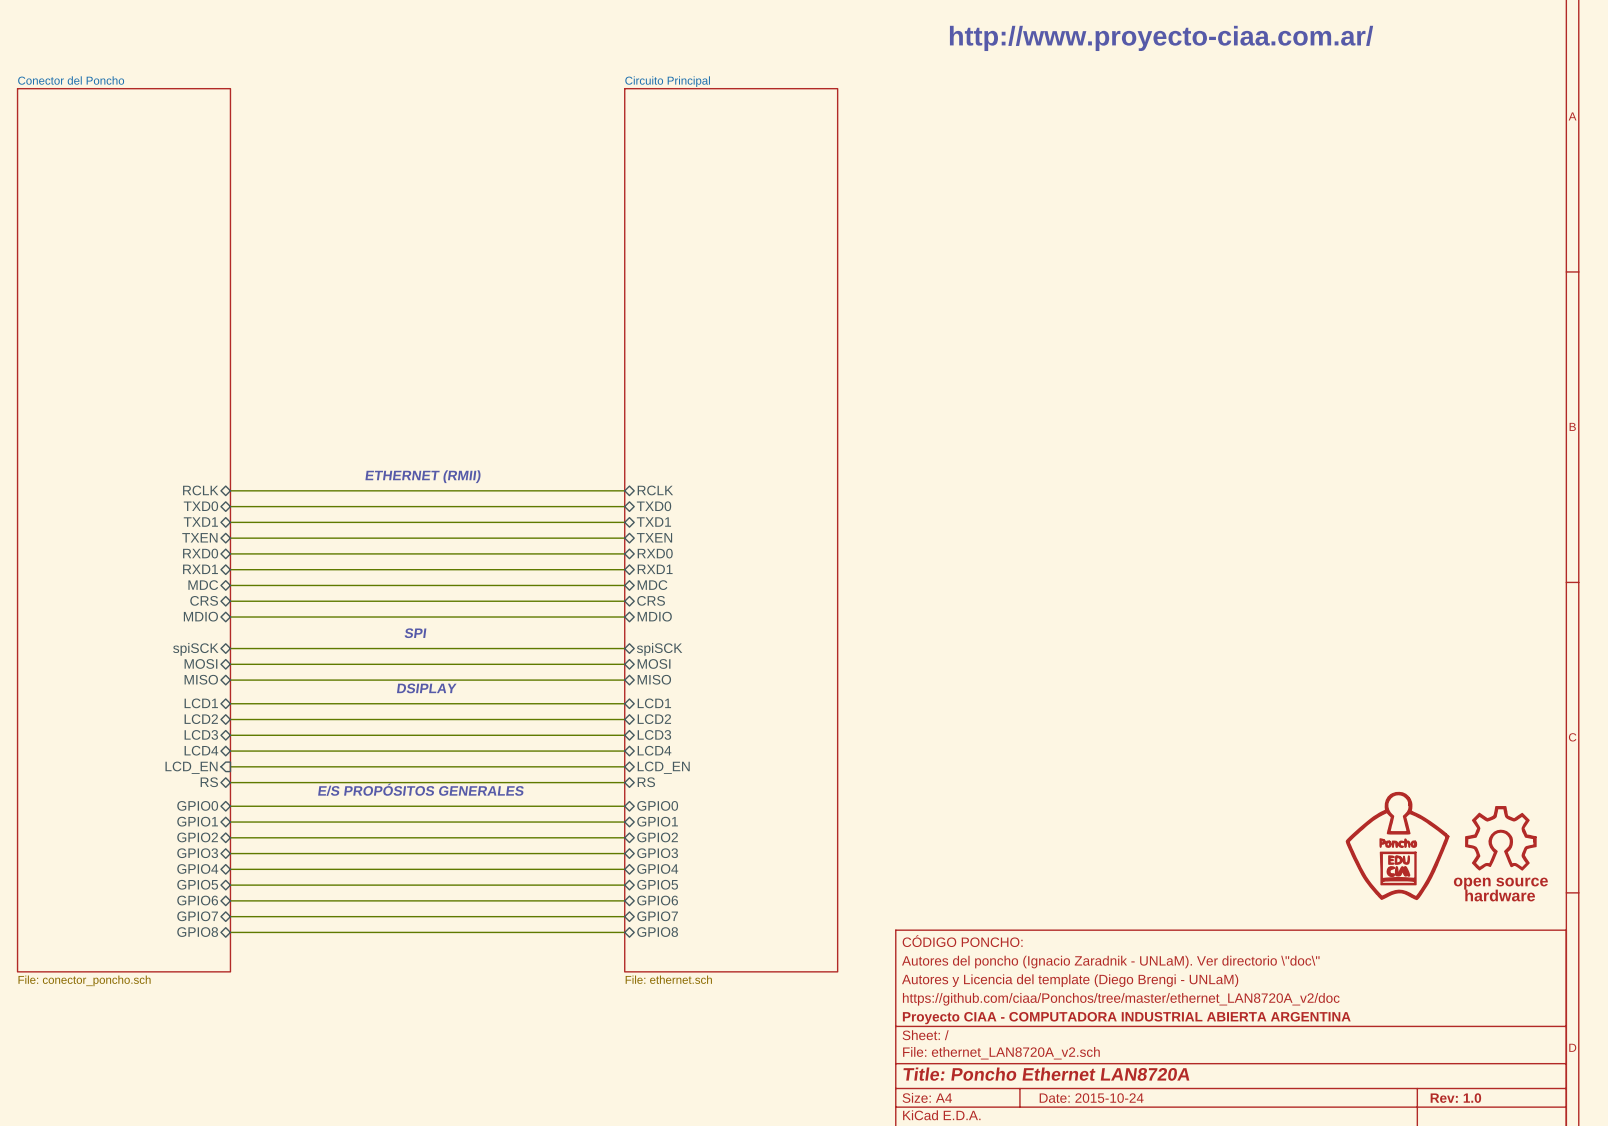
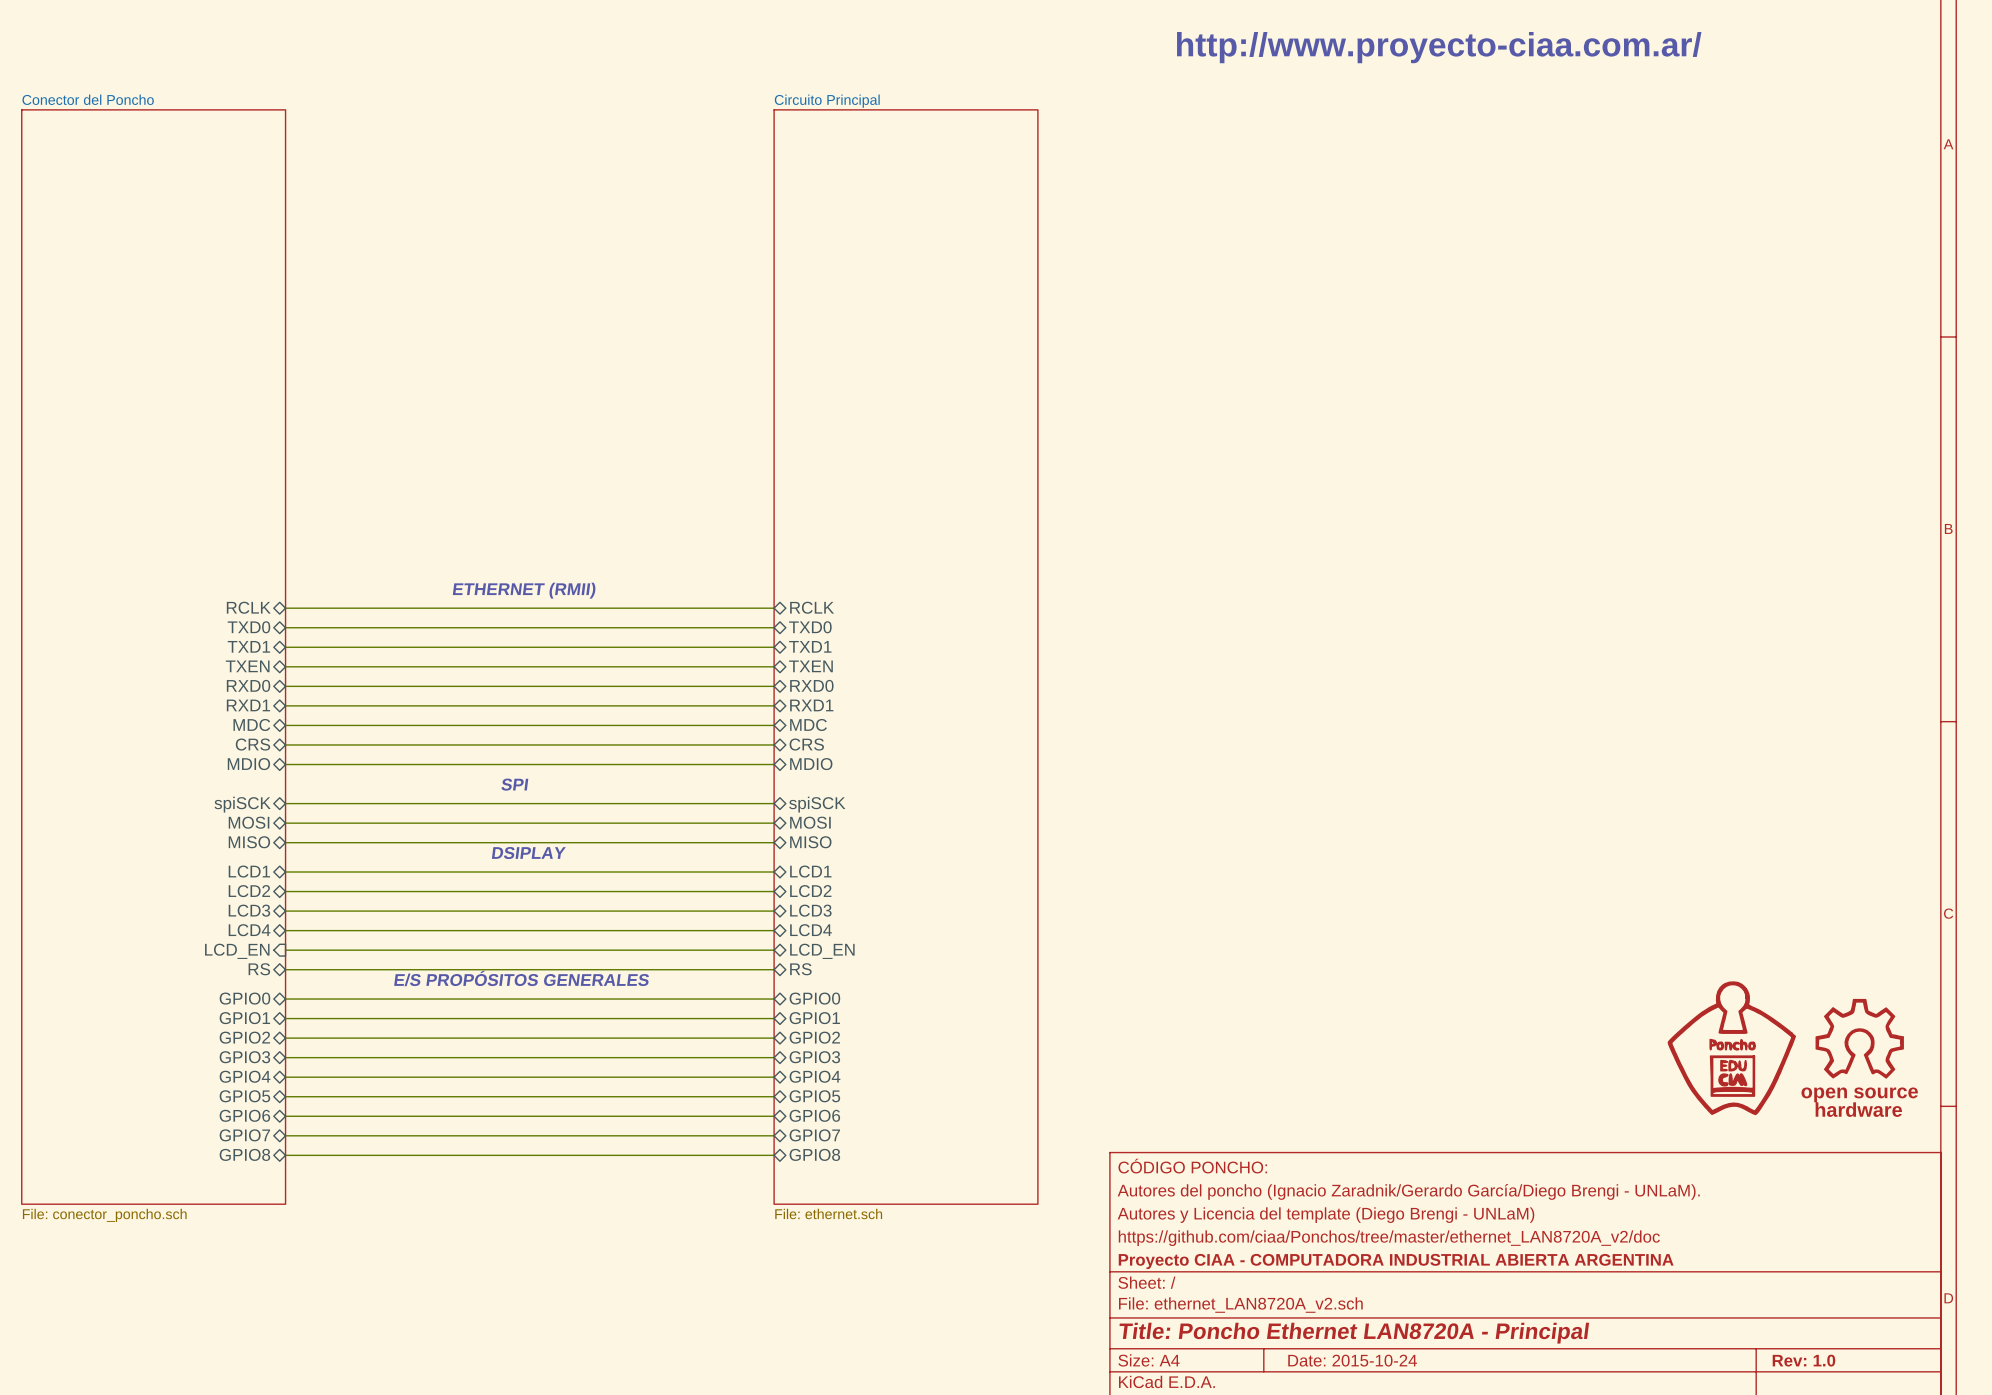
title block: Autores del poncho (Ignacio Zaradnik - UNLaM). Ver directorio \"doc\" (1110, 962) -> Autores del poncho (Ignacio Zaradnik/Gerardo García/Diego Brengi - UNLaM). (1408, 1191)
title block: Title: Poncho Ethernet LAN8720A (1046, 1074) -> Title: Poncho Ethernet LAN8720A - Principal (1354, 1333)

